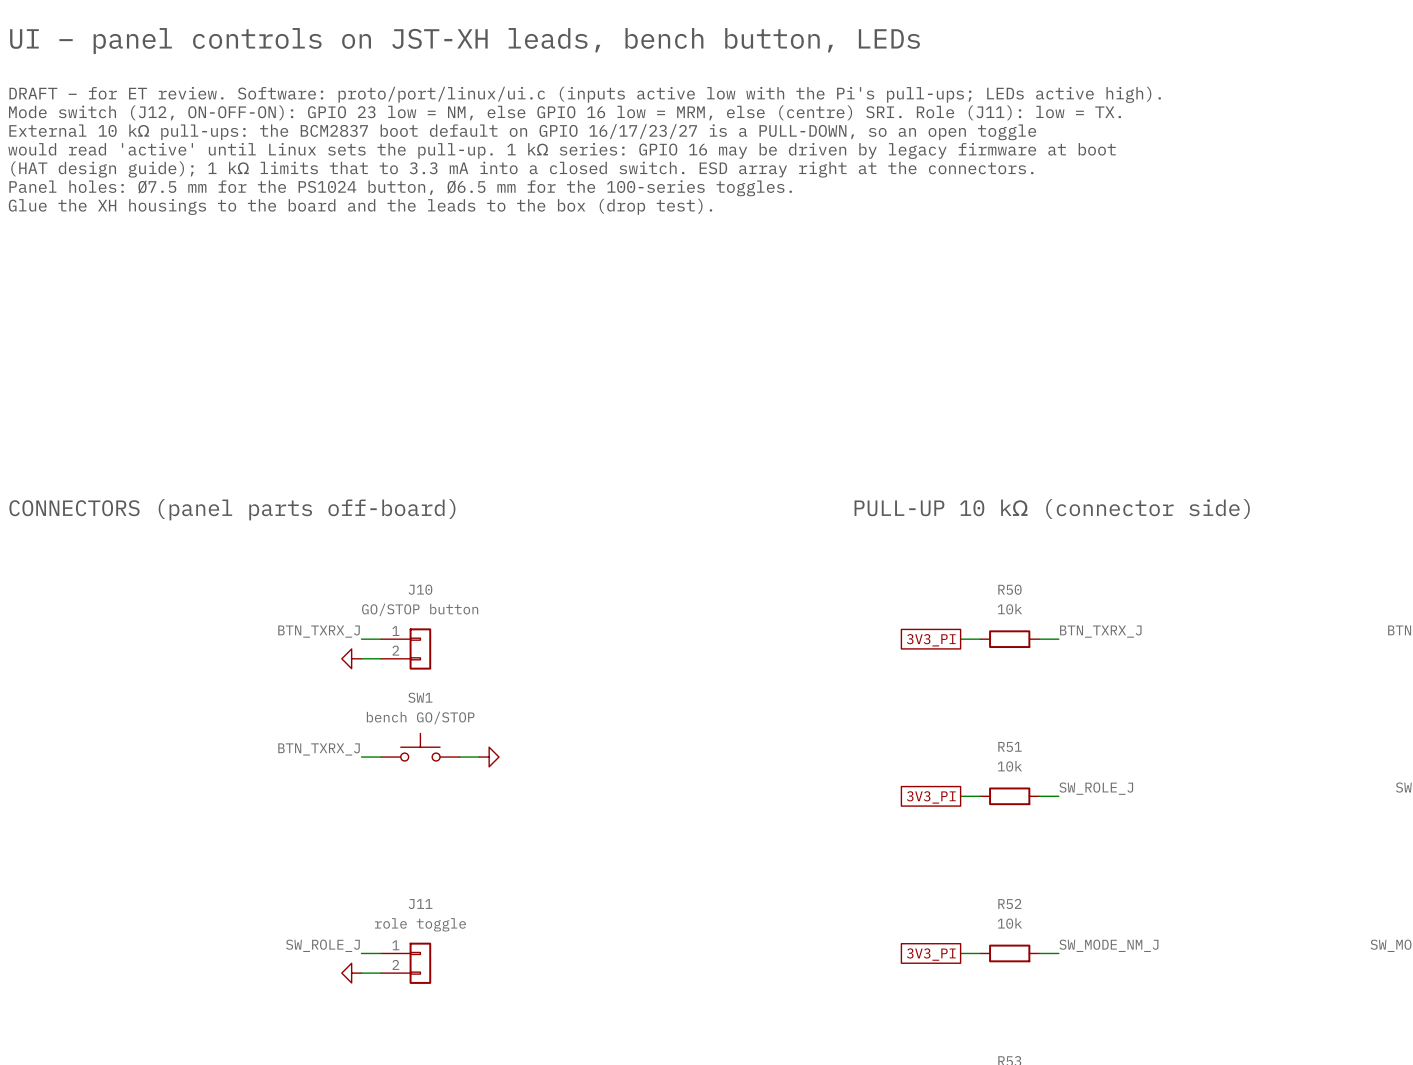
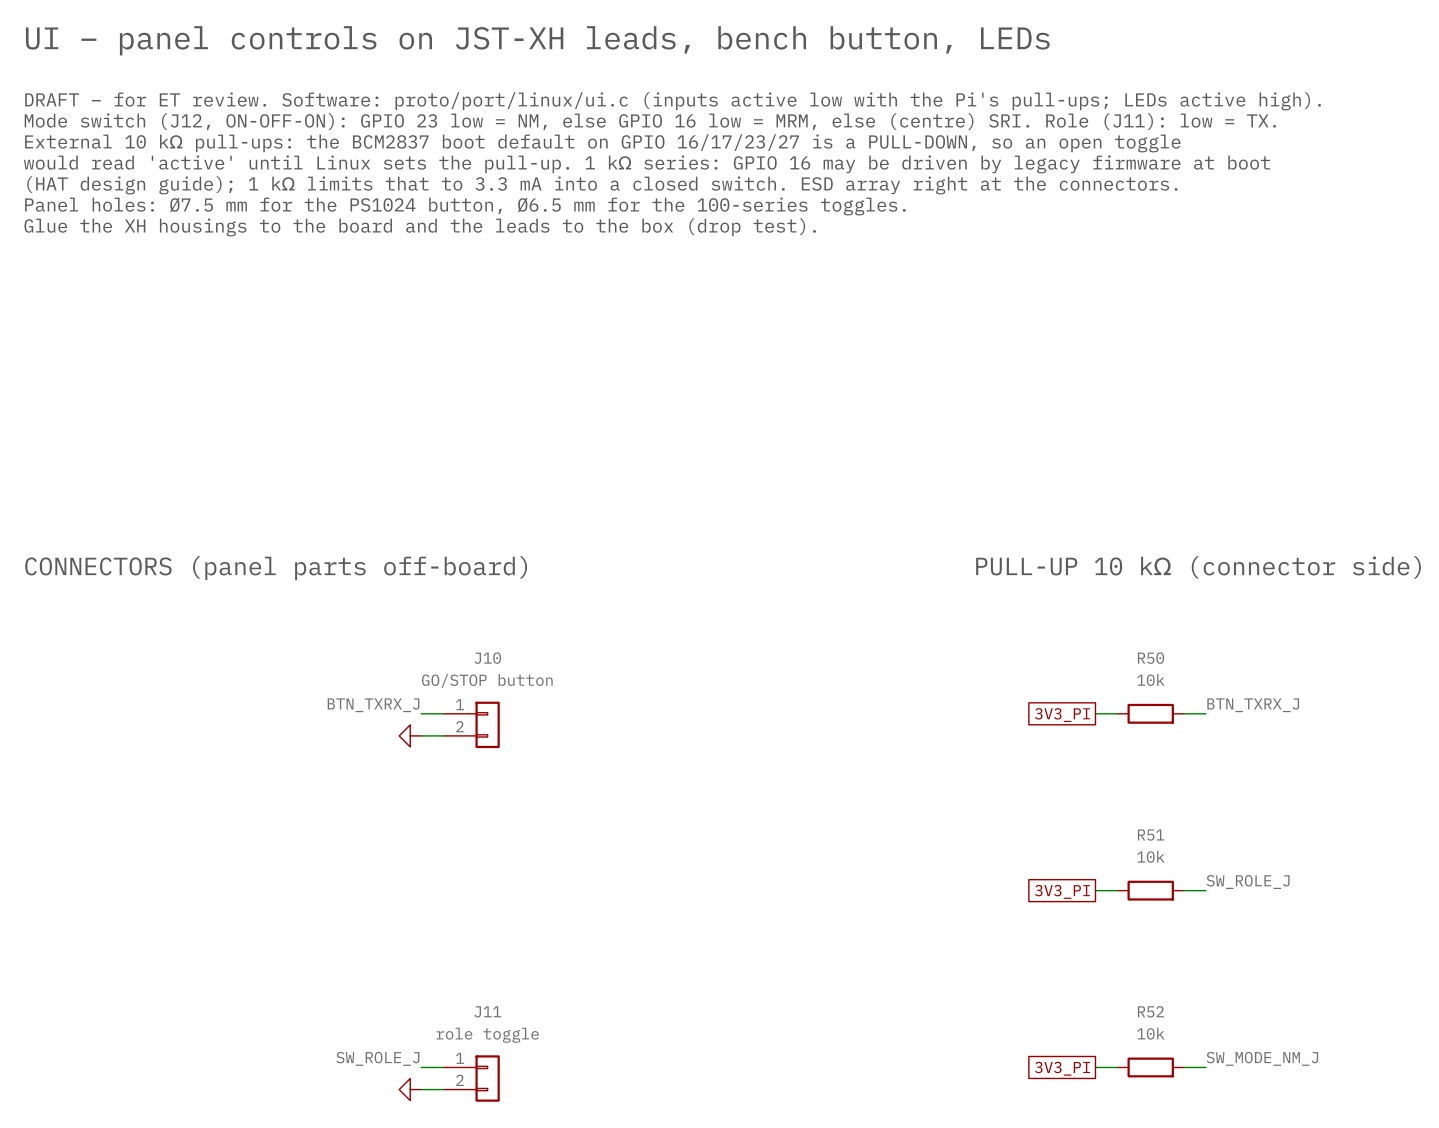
SW1: bench GO/STOP (420, 747) -> none
label: BTN_TXRX_J (319, 749) -> none
wire: (361, 757) (381, 757) -> none
wire: (459, 757) (479, 757) -> none
power symbol: (489, 757) -> none

